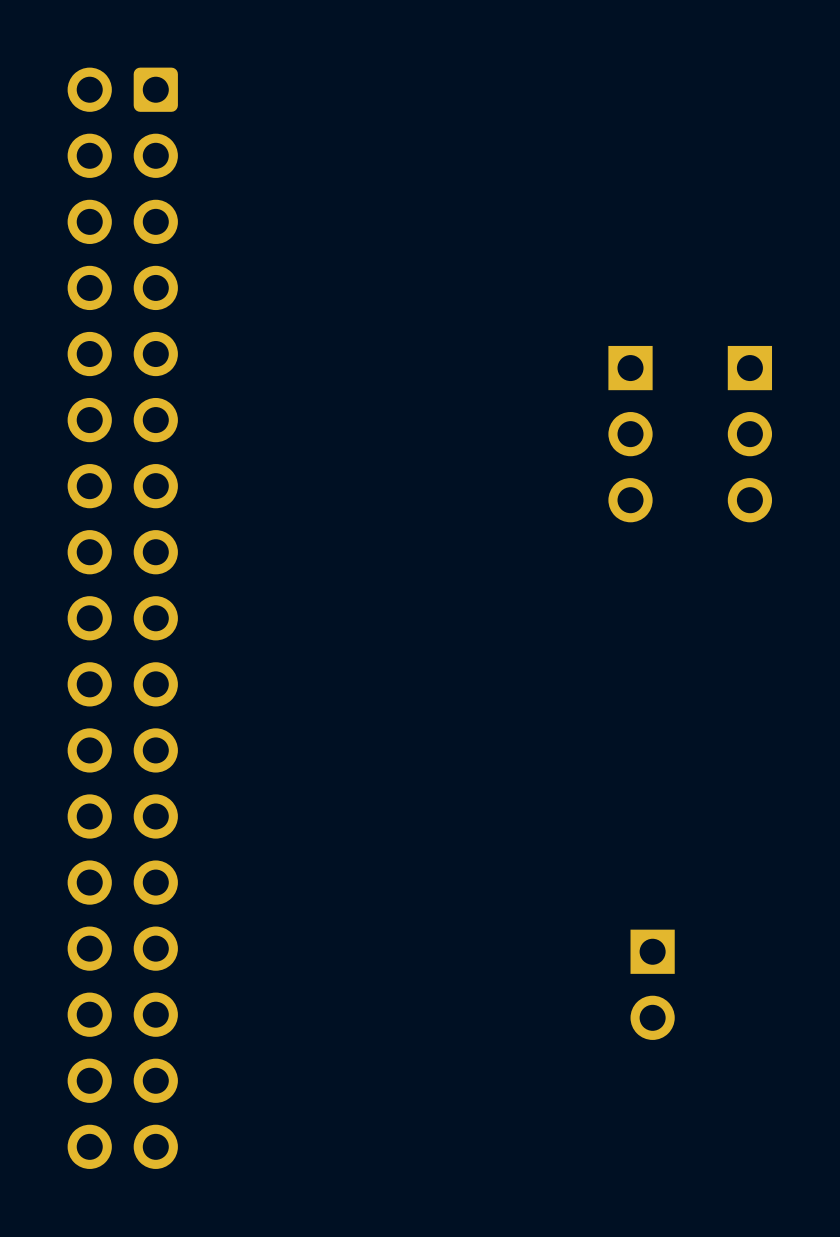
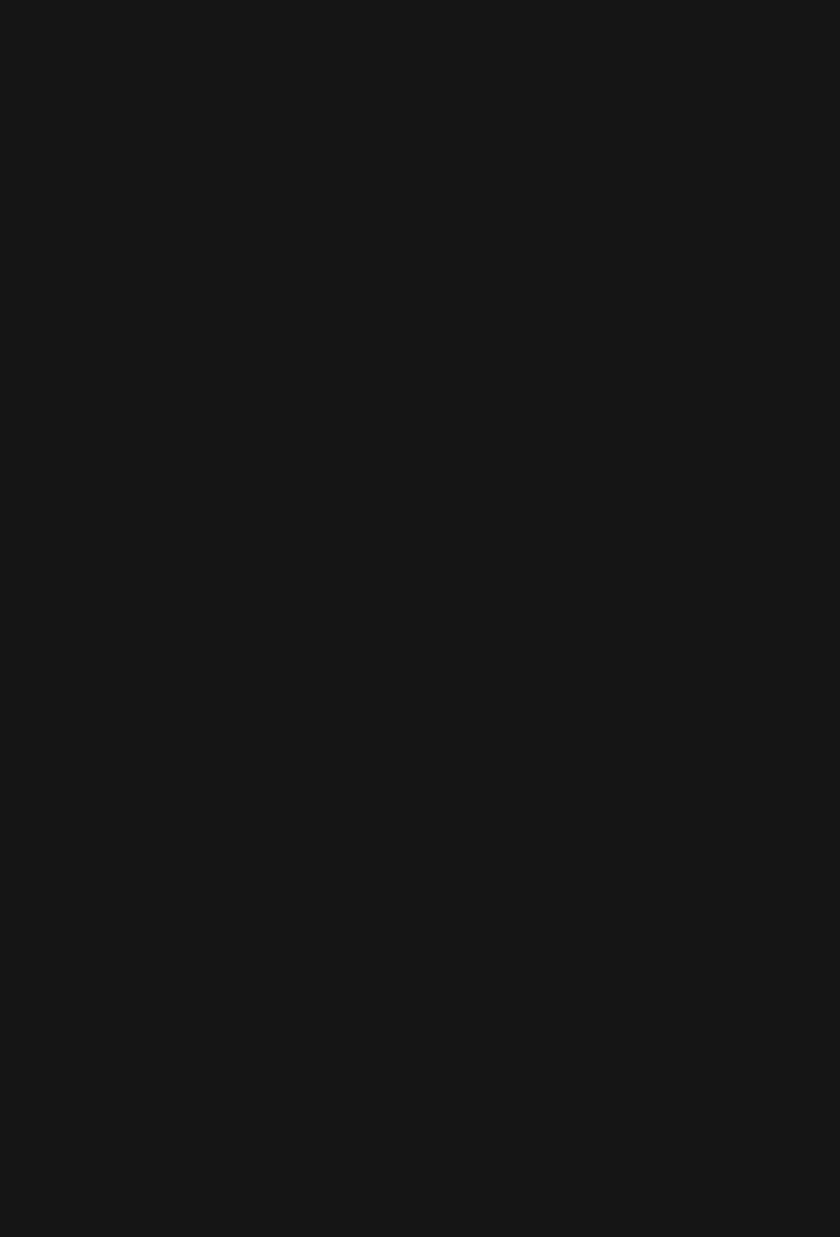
part: (630, 434) -> none
part: (749, 434) -> none
part: (122, 618) -> none
part: (652, 984) -> none

